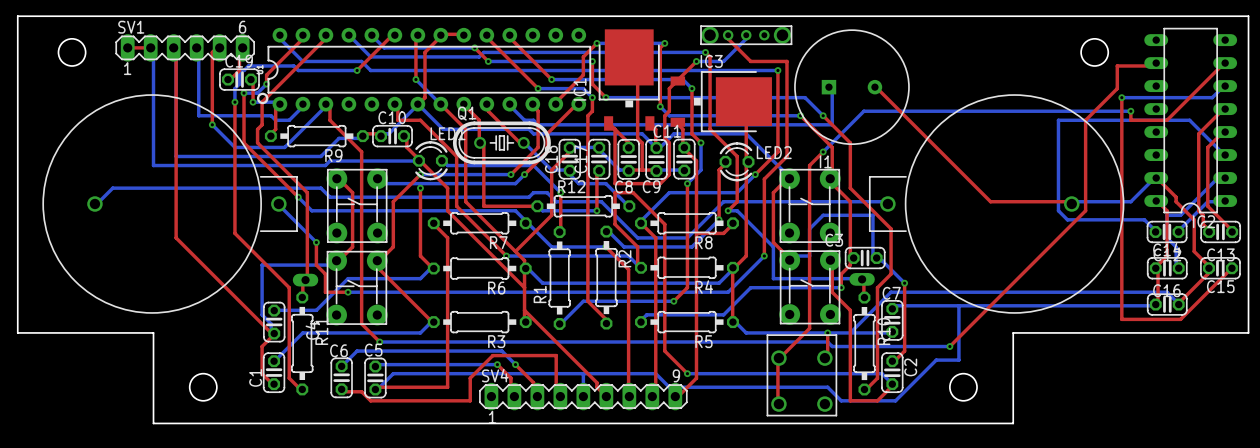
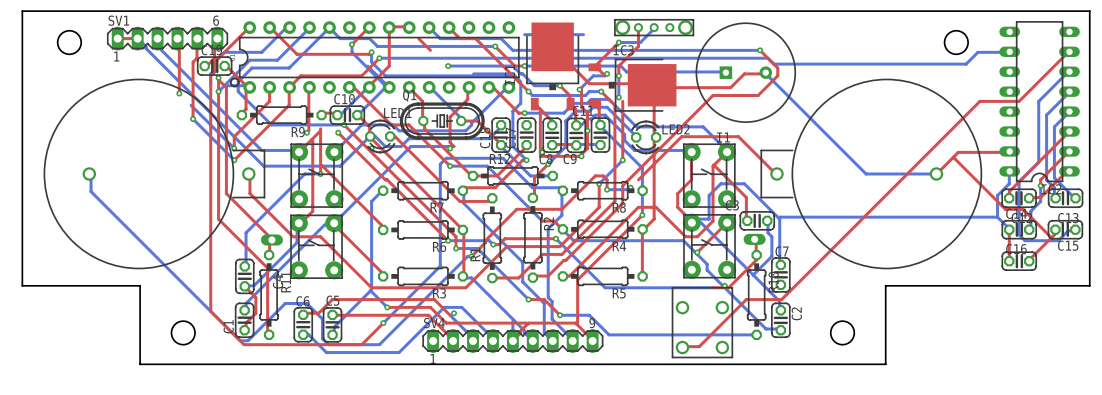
top track: (443, 34) (424, 52) (424, 97) (417, 104) -> (391, 26) (389, 26) (389, 66) (369, 87)
bottom track: (279, 35) (280, 38) (302, 61) (361, 61) (370, 70) (429, 70) -> none
top track: none -> (249, 27) (214, 62) (214, 71) (210, 75) (210, 85)
top track: (302, 35) (302, 38) (266, 75) (266, 84) -> (269, 27) (297, 54) (369, 54) (371, 52)
top track: (325, 35) (325, 38) (262, 102) (262, 124) (257, 129) (257, 142) (307, 192) (307, 278) (302, 283) -> (218, 79) (226, 87) (226, 193) (271, 238) (269, 242)
bottom track: (348, 35) (370, 56) (427, 56) -> (309, 27) (277, 60) (249, 60) (218, 91)
bottom track: none -> (329, 27) (289, 68) (251, 68) (238, 81) (238, 91) (271, 124) (344, 124)
top track: (394, 35) (393, 34) (357, 70) -> none
top track: (417, 35) (415, 38) (415, 79) -> (369, 27) (351, 44)
top track: (486, 35) (538, 88) -> none
top track: (509, 35) (510, 38) (551, 79) -> (449, 27) (459, 38) (475, 38) (528, 91)
bottom track: (746, 36) (746, 38) (723, 61) -> (654, 28) (640, 42) (618, 42)
top track: (728, 38) (750, 61) (786, 61) (786, 156) (764, 179) (764, 256) -> (638, 30) (638, 46) (618, 66) (618, 75)
top track: (596, 43) (583, 56) (583, 75) (555, 104) -> (524, 113) (518, 113) (493, 87) (488, 87)
via: (596, 43) -> none
top track: (664, 43) (660, 47) (660, 106) -> none
via: (664, 43) -> none
bottom track: (151, 47) (153, 47) (153, 165) (325, 165) (329, 161) (418, 160) -> (138, 38) (263, 166) (340, 166) (370, 136) (375, 136) (385, 146) (401, 146) (408, 138) (489, 138) (501, 125)
bottom track: (173, 47) (176, 47) (176, 156) (320, 156) (339, 138) (361, 138) (362, 136) -> (157, 38) (157, 46) (261, 150) (299, 150) (299, 152)
top track: (173, 47) (176, 47) (176, 237) (271, 332) (274, 333) (262, 346) (262, 373) (274, 384) -> (244, 286) (255, 297) (255, 313) (246, 323) (244, 330)
bottom track: (196, 47) (198, 47) (198, 115) (271, 115) (275, 120) (289, 120) (302, 106) (302, 104) -> none
top track: none -> (177, 38) (179, 38) (179, 93)
top track: (219, 47) (212, 52) (212, 124) -> (196, 38) (196, 58) (193, 62) (193, 119)
bottom track: (418, 47) (474, 47) -> (369, 38) (377, 46)
via: (474, 47) -> none
bottom track: (705, 52) (483, 52) (479, 56) -> (495, 46) (422, 46)
top track: (705, 52) (710, 56) (710, 120) -> (618, 42) (610, 50)
bottom track: none -> (351, 44) (351, 52) (387, 87) (389, 87) (389, 87) (385, 87) (357, 115)
via: none -> (351, 44)
top track: none -> (495, 46) (514, 66) (524, 66)
via: none -> (495, 46)
bottom track: (488, 61) (583, 61) -> (429, 27) (440, 38) (501, 38) (512, 50)
via: (488, 61) -> none
bottom track: none -> (520, 50) (610, 50)
top track: (592, 61) (592, 84) (605, 97) -> none
via: (592, 61) -> none
via: (696, 61) -> none
bottom track: none -> (634, 50) (760, 50)
via: none -> (760, 50)
bottom track: none -> (371, 52) (371, 62) (385, 75) (512, 75) (520, 83) (520, 103) (512, 111) (512, 146) (526, 160)
via: none -> (371, 52)
bottom track: none -> (1009, 51) (977, 52) (966, 64) (773, 64) (767, 58) (681, 58)
top track: (1156, 63) (1153, 65) (1117, 65) (1117, 88) (1085, 120) (1085, 210) (949, 346) -> none
bottom track: (248, 65) (293, 65) (298, 70) (357, 70) -> (222, 54) (224, 52) (261, 52) (285, 28) (289, 27)
top track: (637, 65) (637, 138) (642, 142) (642, 170) -> (559, 54) (589, 83) (650, 83) (656, 87) (730, 87) (744, 73) (765, 72)
via: (357, 70) -> none
top track: none -> (379, 58) (361, 75) (300, 75) (289, 87) (289, 105) (234, 160)
via: none -> (379, 58)
top track: (777, 70) (777, 151) (755, 174) -> none
via: (777, 70) -> none
top track: (253, 79) (253, 102) -> (226, 66) (249, 87)
via: (415, 79) -> none
bottom track: none -> (448, 66) (485, 66)
via: none -> (448, 66)
via: (551, 79) -> none
bottom track: (583, 79) (596, 79) -> (512, 66) (534, 85) (559, 85)
via: none -> (524, 66)
top track: none -> (595, 66) (605, 75)
bottom track: (682, 79) (691, 88) -> (599, 66) (620, 66) (626, 71) (725, 72)
top track: (677, 81) (669, 88) (669, 111) (664, 115) (664, 138) (669, 142) -> (581, 87) (581, 107) (587, 113) (587, 121)
bottom track: (266, 84) (257, 93) (244, 93) -> none
via: (266, 84) -> none
bottom track: (828, 87) (832, 88) (832, 124) (538, 124) (533, 120) (524, 120) (509, 104) -> none
top track: (874, 87) (990, 201) (1067, 201) (1071, 203) -> none
via: (538, 88) -> none
top track: (691, 88) (691, 133) (701, 142) -> none
bottom track: none -> (605, 75) (593, 75) (581, 87)
bottom track: none -> (618, 75) (618, 97)
via: none -> (618, 75)
top track: (592, 97) (592, 111) (587, 115) (587, 301) (605, 319) (606, 323) -> (760, 50) (777, 68) (777, 75) (758, 95) (713, 95) (622, 185) (622, 203) (548, 276) (532, 277)
via: (592, 97) -> none
bottom track: (605, 97) (805, 97) (823, 115) -> none
via: (605, 97) -> none
bottom track: (1121, 97) (1212, 97) -> none
top track: (1121, 97) (1121, 319) (1180, 319) (1231, 268) -> none
via: (1121, 97) -> none
via: (234, 102) -> none
via: (253, 102) -> none
top track: none -> (559, 85) (569, 95) (570, 104)
via: none -> (559, 85)
top track: none -> (269, 87) (269, 101) (234, 136) (234, 148)
bottom track: (325, 104) (284, 147) (234, 147) -> (234, 148) (210, 124)
top track: (325, 104) (329, 106) (329, 120) (361, 151) -> none
top track: none -> (309, 87) (308, 130) (306, 132)
top track: (394, 104) (397, 106) (397, 120) (420, 120) (456, 156) (456, 206) (506, 256) -> (349, 87) (353, 87) (391, 124) (408, 124) (450, 166)
top track: (440, 104) (465, 129) (465, 201) (524, 260) (525, 322) -> none
top track: (486, 104) (488, 111) (520, 142) (523, 142) -> (501, 145) (477, 121) (461, 121)
top track: (532, 104) (538, 111) (538, 147) (510, 174) -> (469, 87) (467, 99) (450, 117) (450, 142) (454, 146)
top track: (578, 104) (547, 133) (547, 151) (524, 174) -> none
bottom track: (660, 106) (669, 115) (800, 115) -> none
via: none -> (218, 91)
bottom track: none -> (528, 91) (532, 95) (585, 95) (589, 91) (601, 91)
via: none -> (528, 91)
top track: none -> (601, 91) (614, 105) (614, 201) (561, 254) (542, 254) (518, 277) (492, 278)
via: none -> (601, 91)
bottom track: none -> (1069, 91) (1046, 115) (1046, 179) (1054, 187) (1055, 198)
top track: (1225, 109) (1198, 133) (1198, 210) (1203, 215) (1203, 224) (1209, 231) -> none
via: none -> (179, 93)
bottom track: (1130, 111) (863, 111) (823, 151) -> none
top track: (1130, 111) (1130, 120) -> none
via: (1130, 111) -> none
via: none -> (618, 97)
top track: (800, 115) (832, 147) (832, 174) (830, 178) (832, 179) (832, 183) (850, 201) (850, 256) (853, 258) (850, 260) (850, 265) (841, 274) (841, 287) -> none
via: (800, 115) -> none
top track: (823, 115) (850, 142) (850, 188) (891, 228) (891, 274) (877, 287) (877, 378) (864, 389) -> none
via: (823, 115) -> none
via: (212, 124) -> none
top track: (710, 129) (737, 156) (737, 201) -> (622, 109) (622, 160)
bottom track: none -> (1069, 111) (1054, 126) (1054, 177) (1075, 198)
top track: (1225, 132) (1207, 147) (1207, 206) (1232, 231) -> none
bottom track: (596, 133) (533, 133) (529, 129) (443, 129) (417, 104) (388, 133) (381, 136) -> (369, 87) (340, 115) (337, 115)
via: none -> (524, 113)
bottom track: (642, 133) (656, 147) (660, 147) (673, 133) (746, 133) (789, 178) -> (576, 125) (581, 124) (595, 115) (605, 115) (624, 134) (624, 140) (634, 150) (691, 150) (691, 152)
bottom track: none -> (563, 113) (573, 103) (587, 103) (591, 99) (609, 99) (636, 126) (703, 126) (726, 152)
top track: (404, 136) (406, 138) (406, 147) (447, 188) (447, 210) (524, 287) -> (357, 115) (369, 126) (369, 136) (463, 230) (462, 276)
bottom track: none -> (193, 119) (234, 160)
via: none -> (193, 119)
top track: (244, 142) (298, 197) -> (218, 121) (218, 219) (267, 268) (269, 334)
top track: (481, 142) (483, 142) (483, 206) (535, 206) -> (424, 121) (424, 128) (471, 175)
bottom track: (523, 142) (551, 170) (569, 170) -> (461, 121) (459, 117) (429, 87)
bottom track: (701, 142) (701, 170) (687, 183) -> none
via: (701, 142) -> none
top track: none -> (344, 124) (455, 236) (455, 248)
via: none -> (344, 124)
bottom track: (569, 147) (599, 147) (619, 170) (628, 170) -> none
top track: (569, 147) (569, 151) (551, 170) (551, 215) (515, 251) -> none
bottom track: none -> (600, 125) (642, 168) (642, 215)
top track: (684, 147) (696, 161) (696, 378) (678, 396) (675, 396) -> (512, 341) (528, 323) (575, 323) (592, 341)
top track: (823, 151) (809, 165) (809, 328) (777, 360) (778, 404) -> (987, 101) (979, 101) (781, 299) (746, 299) (699, 346) (682, 347)
via: (823, 151) -> none
top track: none -> (320, 130) (299, 152)
via: none -> (587, 130)
bottom track: (1225, 155) (1189, 120) (1058, 120) (1058, 210) (1067, 219) (1144, 219) (1155, 231) -> none
top track: none -> (1069, 131) (1009, 191) (1009, 198)
via: none -> (306, 132)
top track: none -> (338, 132) (448, 240)
via: none -> (338, 132)
bottom track: (441, 160) (447, 165) (533, 165) (560, 192) -> none
bottom track: none -> (636, 137) (607, 107) (593, 107) (589, 111) (575, 111) (565, 121) (565, 146) (548, 164)
top track: (725, 161) (719, 170) (719, 219) -> none
top track: (599, 170) (596, 174) (596, 210) -> (526, 145) (497, 175) (473, 175)
bottom track: (569, 172) (578, 183) (605, 183) (628, 206) -> (501, 146) (530, 175) (552, 175)
via: none -> (234, 148)
bottom track: (420, 174) (510, 174) -> none
top track: (420, 174) (393, 201) (393, 246) (377, 260) (379, 269) (433, 322) -> (334, 223) (381, 272) (383, 276)
bottom track: (524, 174) (515, 183) (384, 183) (377, 178) -> (508, 87) (465, 130) (399, 130) (393, 124) (361, 124) (334, 152)
via position: (524, 174) -> (450, 166)
bottom track: (755, 174) (737, 192) (669, 192) (641, 223) -> none
via: (755, 174) -> none
top track: (336, 178) (352, 192) -> (311, 139) (312, 164)
top track: (789, 178) (773, 192) (773, 226) -> (691, 152) (691, 179) (677, 193)
top track: none -> (726, 152) (713, 166) (713, 221) (697, 236) (685, 236) (656, 207) (638, 207) (569, 276) (562, 276)
bottom track: (1156, 178) (1130, 201) (1072, 201) (1071, 203) -> (765, 72) (866, 173) (936, 173)
top track: (1156, 178) (1176, 197) (1176, 201) (1194, 219) (1194, 251) (1208, 268) -> (1009, 151) (958, 152) (936, 173)
bottom track: (1225, 178) (1216, 179) (1180, 215) (1167, 215) -> (1058, 81) (1038, 101) (1038, 162) (1019, 183)
top track: none -> (1069, 151) (1040, 179) (1040, 185)
via: none -> (542, 152)
via: none -> (581, 156)
top track: (687, 183) (687, 287) (673, 301) -> none
via: (687, 183) -> none
top track: none -> (953, 157) (1005, 209) (1023, 209) (1049, 235)
via: none -> (234, 160)
top track: (420, 188) (420, 256) (433, 268) -> (321, 165) (381, 225) (383, 229)
via: (420, 188) -> none
top track: none -> (526, 160) (522, 160) (495, 187) (465, 187) (462, 190)
via: none -> (526, 160)
bottom track: none -> (622, 160) (599, 183)
via: none -> (622, 160)
top track: (560, 192) (559, 232) -> (390, 136) (395, 136) (459, 201) (489, 201) (492, 198)
via: (560, 192) -> none
top track: none -> (548, 164) (534, 177) (534, 197) (532, 197)
via: none -> (548, 164)
top track: none -> (714, 165) (746, 197) (747, 220)
bottom track: none -> (450, 166) (487, 166) (542, 221)
bottom track: (298, 197) (311, 210) (515, 210) (525, 223) (551, 246) (605, 246) -> none
via: (298, 197) -> none
top track: none -> (646, 172) (681, 136) (738, 136) (776, 173)
bottom track: none -> (1009, 171) (1009, 183) (997, 195) (997, 217)
top track: (1156, 201) (1167, 210) (1167, 256) (1155, 268) (1158, 269) (1158, 301) (1155, 304) -> (1009, 229) (1009, 261)
bottom track: (1225, 201) (1207, 201) (1178, 231) -> none
top track: none -> (1069, 171) (1068, 170) (1040, 197) (1029, 198)
bottom track: (94, 203) (112, 188) (320, 188) (329, 197) (529, 197) (533, 192) (547, 192) (556, 201) (601, 201) (637, 237) (687, 237) (723, 201) (886, 201) (887, 203) -> (89, 173) (91, 173) (91, 191) (240, 340) (248, 340) (285, 303) (306, 303) (322, 319) (322, 338) (328, 344) (379, 344) (467, 256) (471, 256)
bottom track: (278, 203) (316, 242) -> none
top track: none -> (248, 173) (249, 193) (293, 236) (320, 236) (371, 287) (465, 287) (507, 246) (559, 246) (599, 207) (599, 183)
top track: (361, 203) (361, 323) (379, 342) -> none
via: none -> (320, 173)
bottom track: (537, 206) (542, 210) (596, 210) -> none
via: (596, 210) -> none
bottom track: (728, 210) (737, 210) (773, 246) (773, 278) (862, 279) -> none
via: (728, 210) -> none
via: none -> (599, 183)
bottom track: (850, 215) (872, 215) (872, 256) (877, 260) (882, 260) (904, 283) -> (744, 183) (779, 219) (780, 264)
via: none -> (1040, 185)
bottom track: (719, 219) (691, 246) (624, 246) (606, 231) -> none
bottom track: none -> (607, 189) (630, 189)
top track: none -> (607, 189) (607, 179) (603, 175) (595, 175) (561, 209) (516, 209) (471, 256)
via: none -> (607, 189)
top track: (433, 223) (447, 237) (447, 387) (379, 387) (375, 389) -> none
bottom track: none -> (462, 190) (463, 203) (522, 262) (522, 281) (544, 303) (544, 332) (552, 341)
top track: (641, 223) (655, 237) (655, 396) (652, 396) -> none
top track: (732, 223) (723, 233) (696, 233) -> none
top track: (234, 233) (289, 287) (289, 378) (302, 389) -> (210, 199) (210, 311) (244, 344) (328, 344)
bottom track: (1167, 237) (1176, 246) (1176, 265) (1178, 268) -> (1040, 185) (1040, 201) (1030, 211) (1030, 228) (1029, 229)
bottom track: none -> (1019, 203) (1019, 234) (1025, 240) (1058, 240) (1068, 230) (1075, 229)
top track: (316, 242) (316, 265) (325, 274) (325, 292) (348, 292) -> none
via: (316, 242) -> none
top track: (605, 246) (628, 269) (629, 396) -> none
top track: none -> (642, 215) (577, 279) (576, 324)
via: none -> (642, 215)
bottom track: none -> (997, 217) (1009, 229)
bottom track: none -> (997, 217) (778, 218)
bottom track: (506, 256) (628, 256) (641, 267) -> none
via: (506, 256) -> none
bottom track: (764, 256) (728, 292) (348, 292) -> none
via: (764, 256) -> none
bottom track: none -> (767, 220) (767, 232) (771, 236) (771, 256) (753, 275)
bottom track: (336, 260) (334, 265) (262, 265) (262, 314) (271, 323) (271, 332) (274, 333) -> (298, 223) (297, 225) (297, 242) (253, 285) (244, 286)
bottom track: none -> (691, 222) (701, 223) (779, 301) (780, 310)
top track: (830, 260) (832, 260) (832, 292) (850, 310) (850, 400) (877, 400) (892, 384) -> (727, 222) (697, 252)
top track: (641, 267) (637, 265) (637, 246) (615, 224) (615, 192) (633, 192) (664, 224) (664, 351) (687, 373) -> (562, 229) (554, 221) (542, 221)
bottom track: (732, 267) (719, 283) (542, 283) (525, 268) -> none
bottom track: (433, 268) (429, 269) (420, 278) (348, 278) (316, 310) (275, 310) -> (320, 173) (304, 173) (246, 232) (246, 266)
bottom track: none -> (556, 238) (605, 287) (713, 287)
top track: none -> (556, 238) (505, 238) (499, 244) (493, 244)
via: none -> (556, 238)
bottom track: none -> (448, 240) (489, 240) (493, 244)
via: none -> (448, 240)
top track: (904, 283) (904, 351) (892, 361) -> none
via: (904, 283) -> none
via: none -> (493, 244)
bottom track: (841, 287) (750, 287) (723, 314) (646, 314) (641, 322) -> none
via: (841, 287) -> none
bottom track: none -> (455, 248) (477, 248) (528, 299)
via: none -> (455, 248)
via: (348, 292) -> none
via: none -> (697, 252)
top track: none -> (756, 255) (756, 260) (728, 287) (713, 287)
via: none -> (471, 256)
bottom track: (673, 301) (583, 301) (559, 323) -> none
via: (673, 301) -> none
bottom track: (1155, 304) (895, 305) (892, 308) -> none
bottom track: (1178, 304) (1167, 292) (891, 292) (850, 332) -> none
bottom track: (958, 305) (958, 360) (936, 360) (895, 400) (841, 400) (827, 387) (669, 387) (675, 396) (678, 396) (655, 373) (393, 373) (375, 389) -> (383, 190) (371, 201) (371, 289) (334, 327) (334, 334) (332, 334)
top track: (524, 310) (596, 382) (596, 387) (606, 396) -> none
bottom track: (433, 322) (420, 332) (302, 332) (275, 360) -> (454, 146) (410, 146) (332, 225) (324, 225) (246, 303) (246, 309)
bottom track: none -> (462, 276) (471, 277) (532, 341)
bottom track: (732, 322) (746, 332) (892, 331) -> none
top track: (827, 332) (827, 355) (824, 358) -> none
bottom track: none -> (370, 290) (387, 307)
bottom track: (379, 342) (827, 342) (832, 346) (949, 346) -> none
via: (379, 342) -> none
via: (949, 346) -> none
top track: none -> (528, 299) (544, 299) (559, 315)
via: none -> (528, 299)
top track: none -> (387, 307) (430, 307) (446, 323) (527, 324)
via: none -> (387, 307)
bottom track: (497, 364) (379, 364) (375, 366) -> none
top track: (497, 364) (510, 378) (510, 396) (514, 396) -> (332, 314) (428, 315) (453, 341)
via: (497, 364) -> none
bottom track: (515, 364) (501, 351) (357, 351) (341, 366) -> none
top track: (515, 364) (533, 382) (533, 396) (537, 396) -> none
top track: none -> (303, 314) (318, 313) (332, 299) (434, 299) (450, 315)
bottom track: none -> (450, 315) (471, 336) (473, 341)
bottom track: none -> (559, 315) (589, 315) (609, 334) (756, 334)
via: none -> (559, 315)
bottom track: (687, 373) (882, 373) (891, 382) -> (562, 229) (573, 240) (683, 240) (707, 264) (707, 270) (766, 328) (779, 328)
via: (687, 373) -> none
bottom track: none -> (383, 323) (440, 266) (440, 164) (446, 158) (503, 158) (532, 187) (559, 187) (562, 190) (561, 215) (548, 228) (548, 297) (552, 301) (552, 319) (572, 341)
via: none -> (383, 323)
bottom track: none -> (303, 334) (308, 334) (326, 352) (399, 352) (444, 307) (461, 307) (491, 336) (492, 341)
top track: (341, 389) (343, 391) (361, 391) (370, 400) -> none
top track: (560, 396) (556, 396) (556, 355) (492, 355) (470, 378) (470, 400) (409, 400) -> (383, 323) (361, 344)

